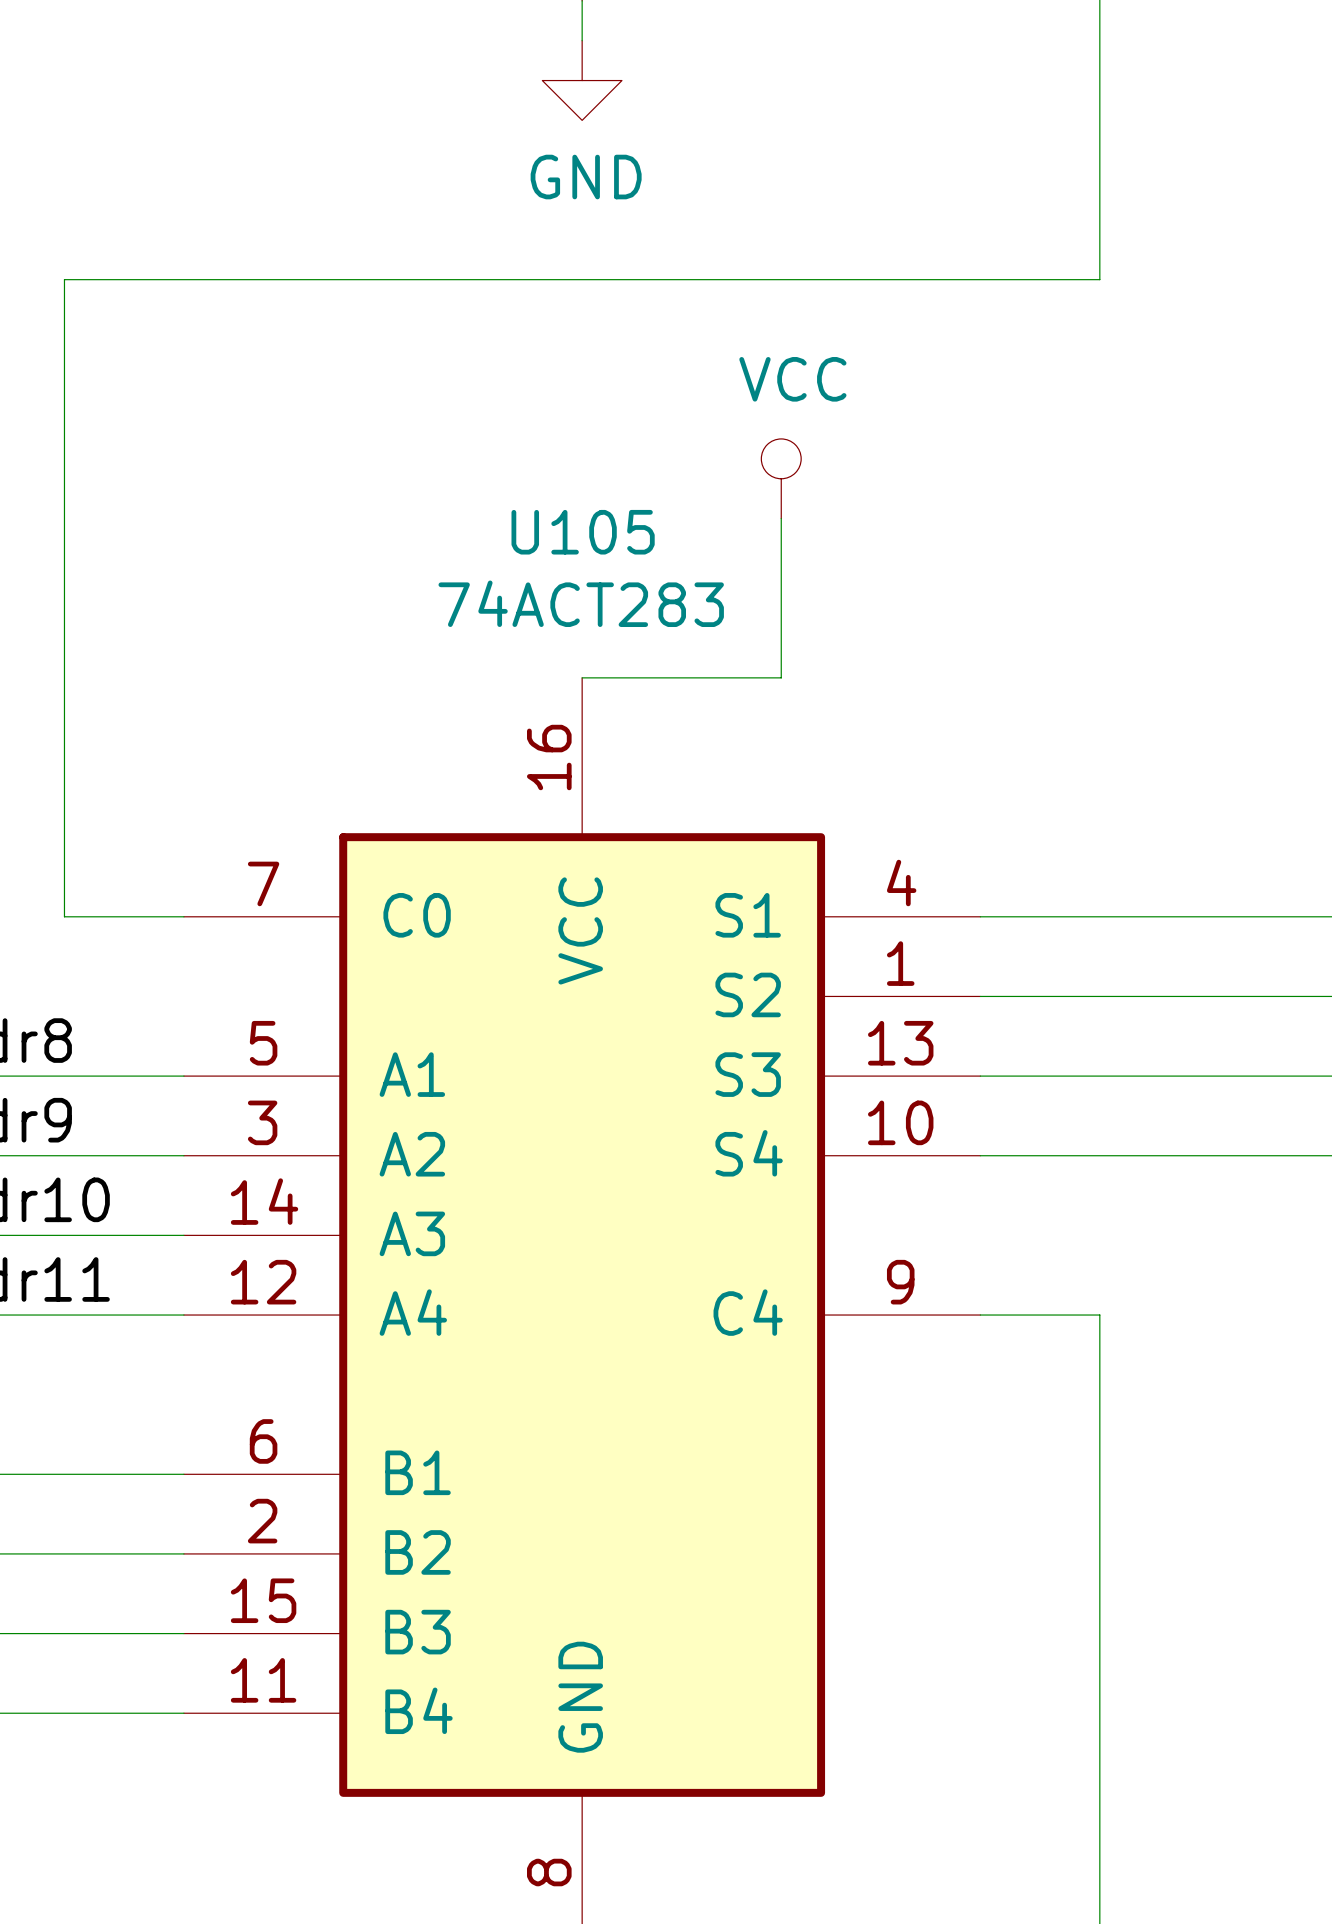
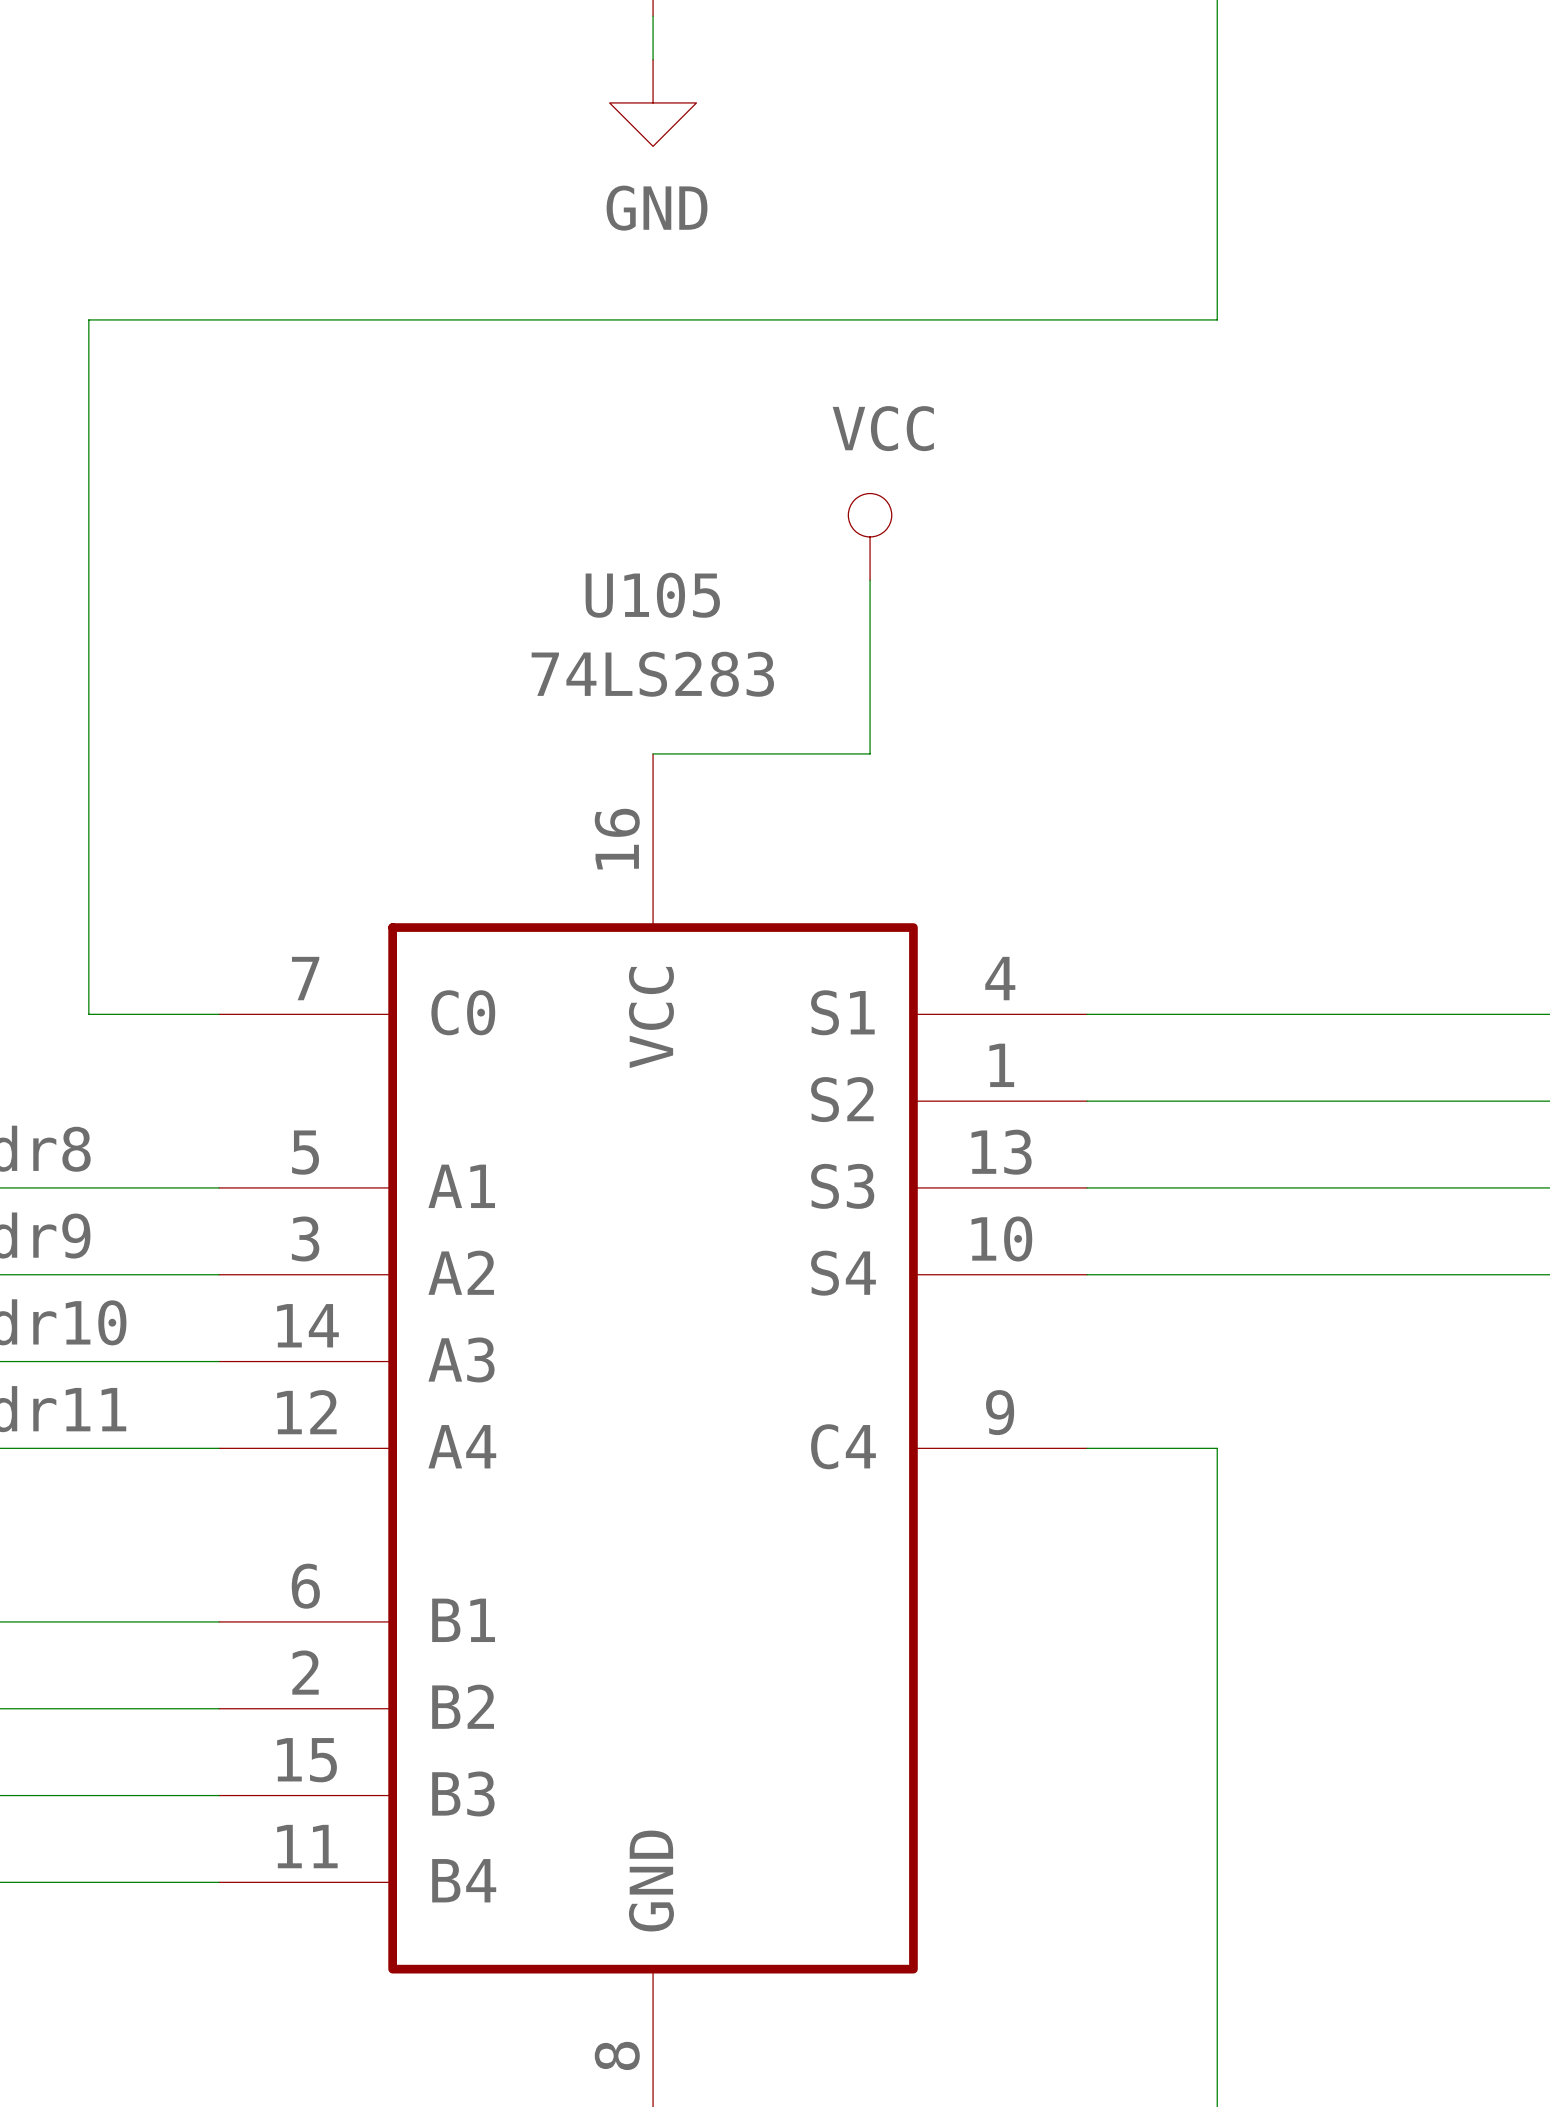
U105 value: 74ACT283 (581, 603) -> 74LS283 (652, 674)

